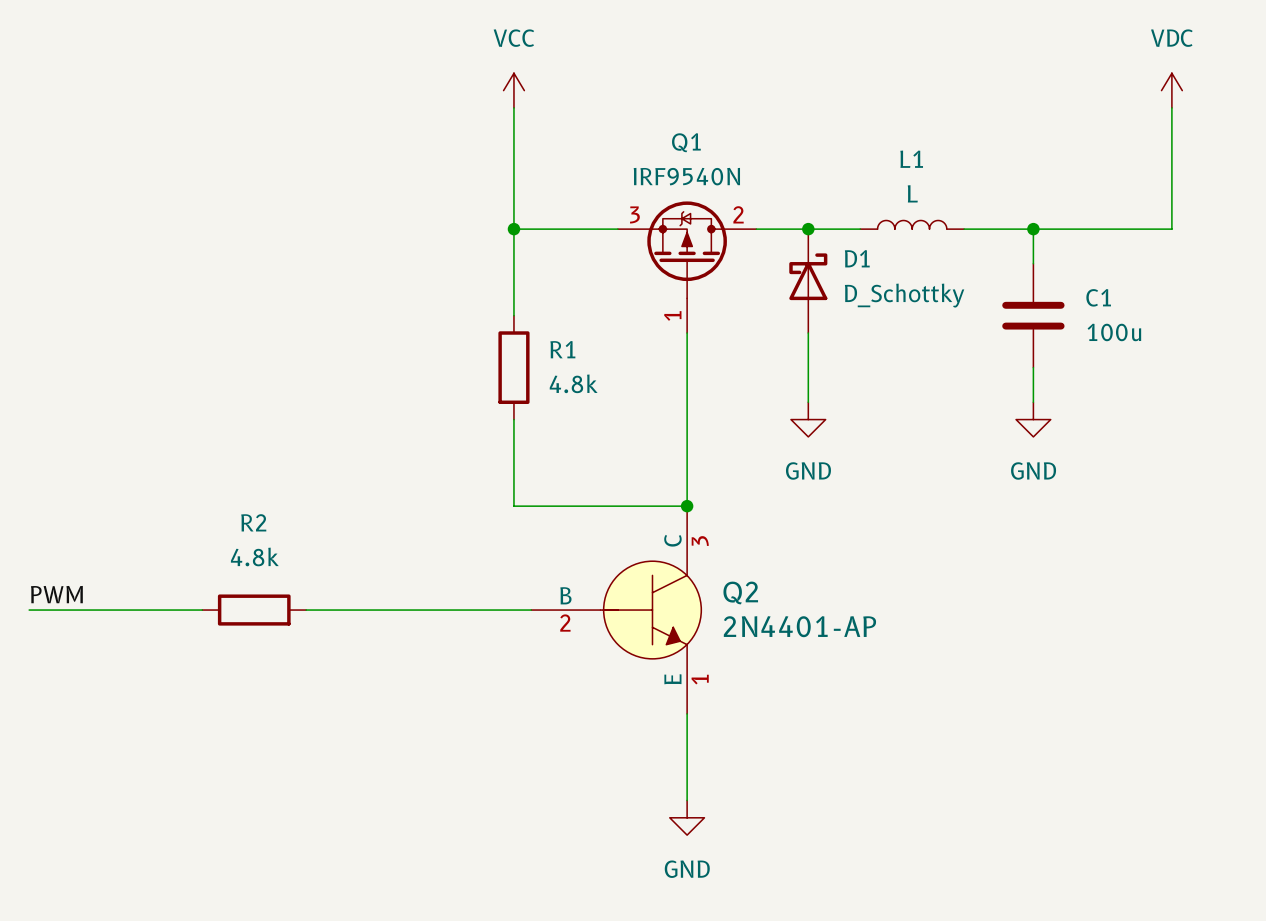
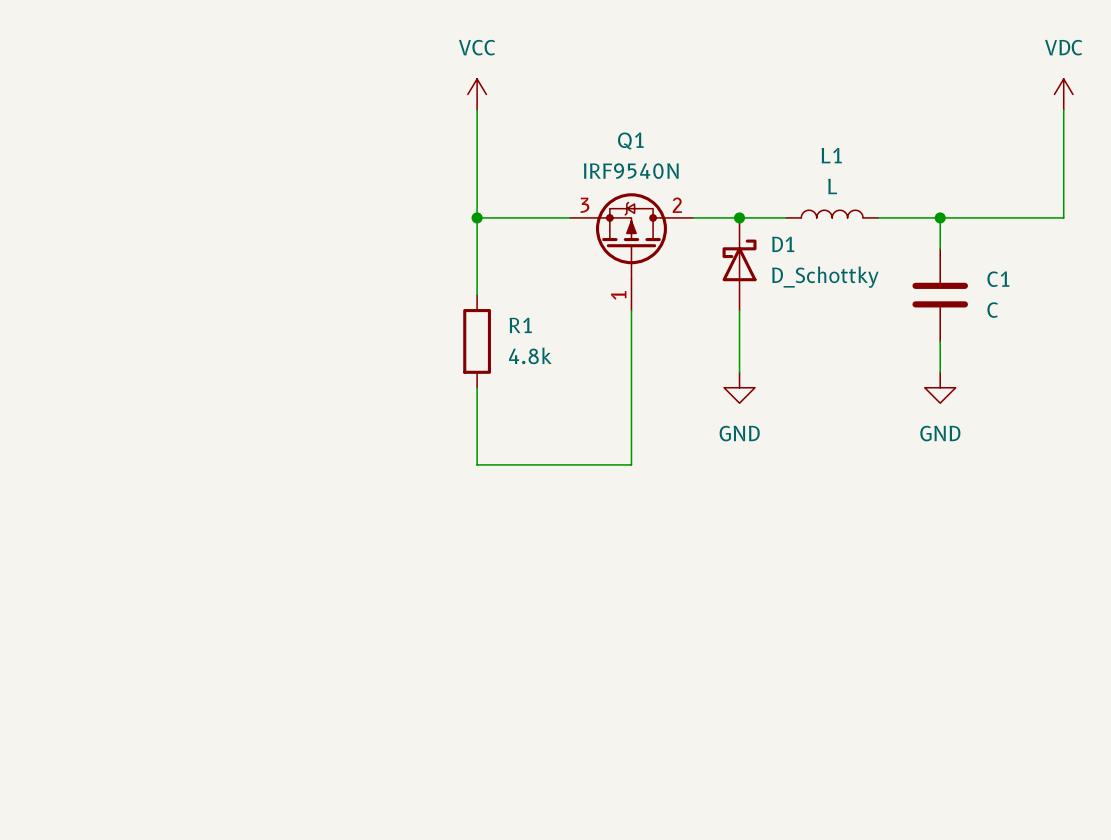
C1 value: 100u (1114, 332) -> C (992, 310)
junction: (687, 506) -> none
label: PWM (56, 594) -> none
wire: (29, 610) (202, 610) -> none
R2: 4.8k (254, 610) -> none
wire: (306, 610) (531, 610) -> none
Q2: 2N4401-AP (616, 610) -> none
wire: (687, 713) (687, 800) -> none
power symbol: GND (687, 817) -> none

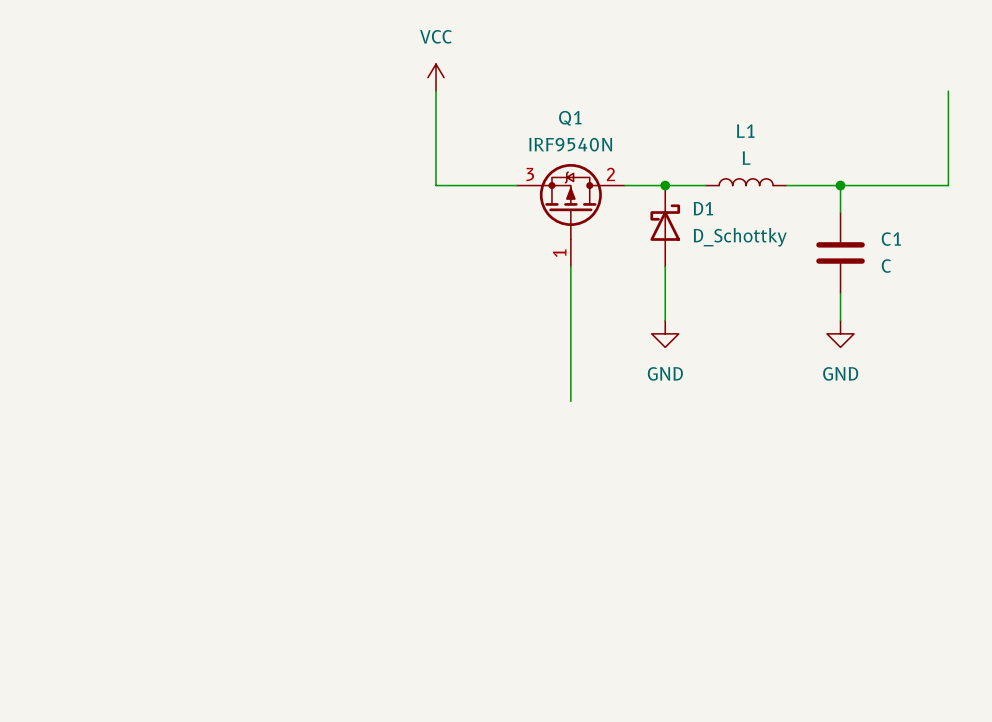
power symbol: VDC (1063, 94) -> none
wire: (477, 217) (477, 295) -> none
junction: (477, 217) -> none
R1: 4.8k (477, 341) -> none
wire: (477, 387) (477, 464) (631, 464) -> none

